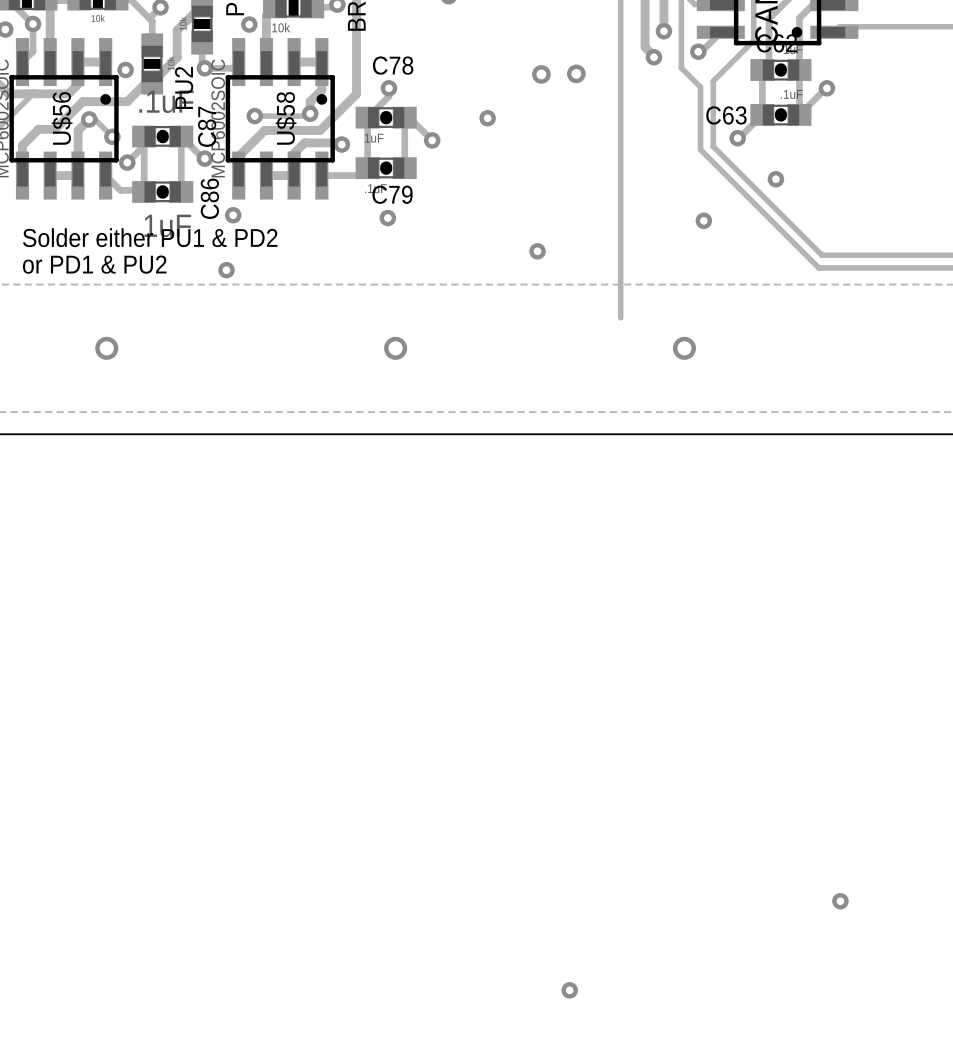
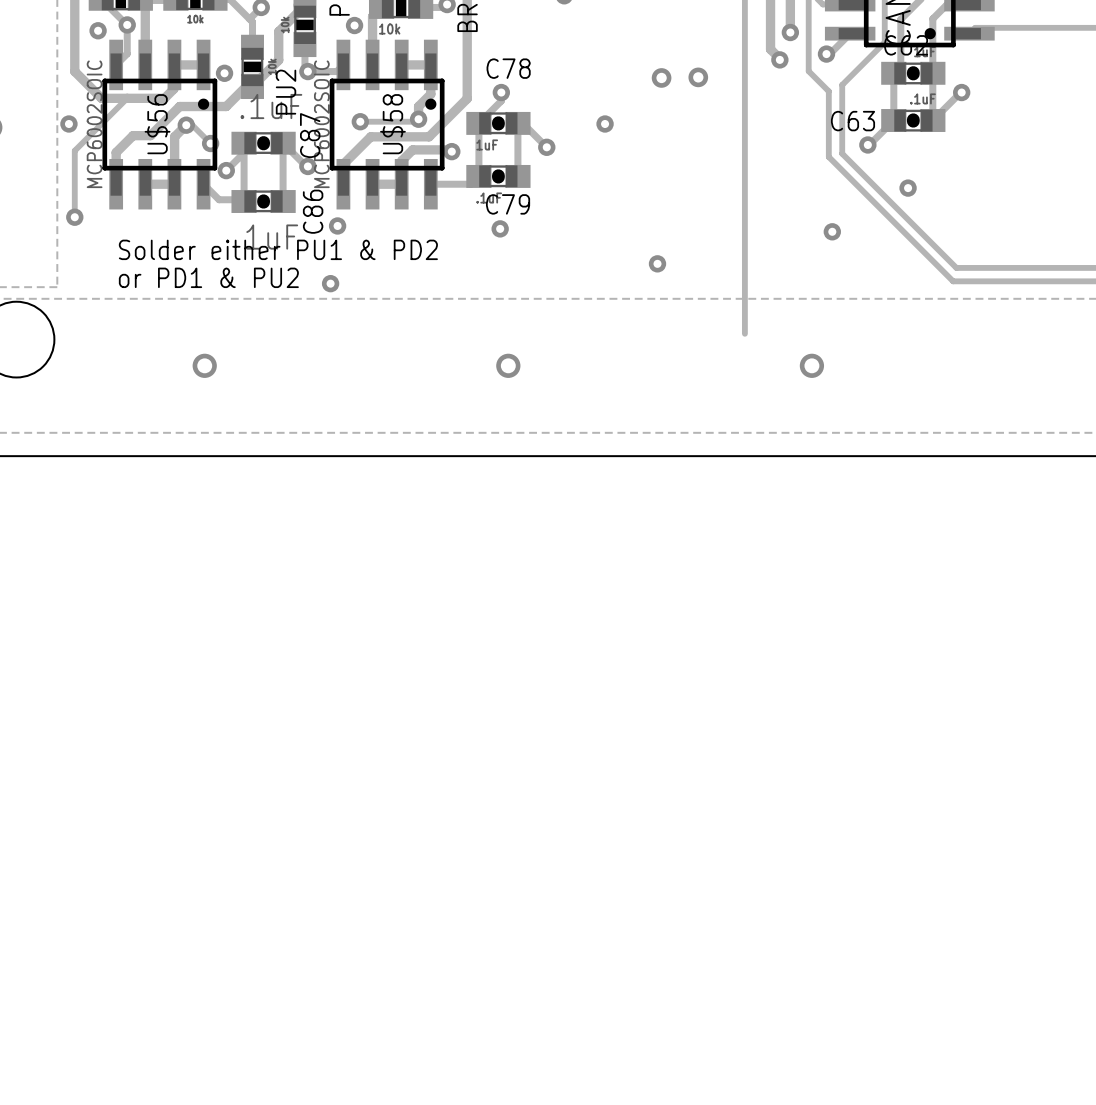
via: (840, 901) -> none
via: (569, 990) -> none

